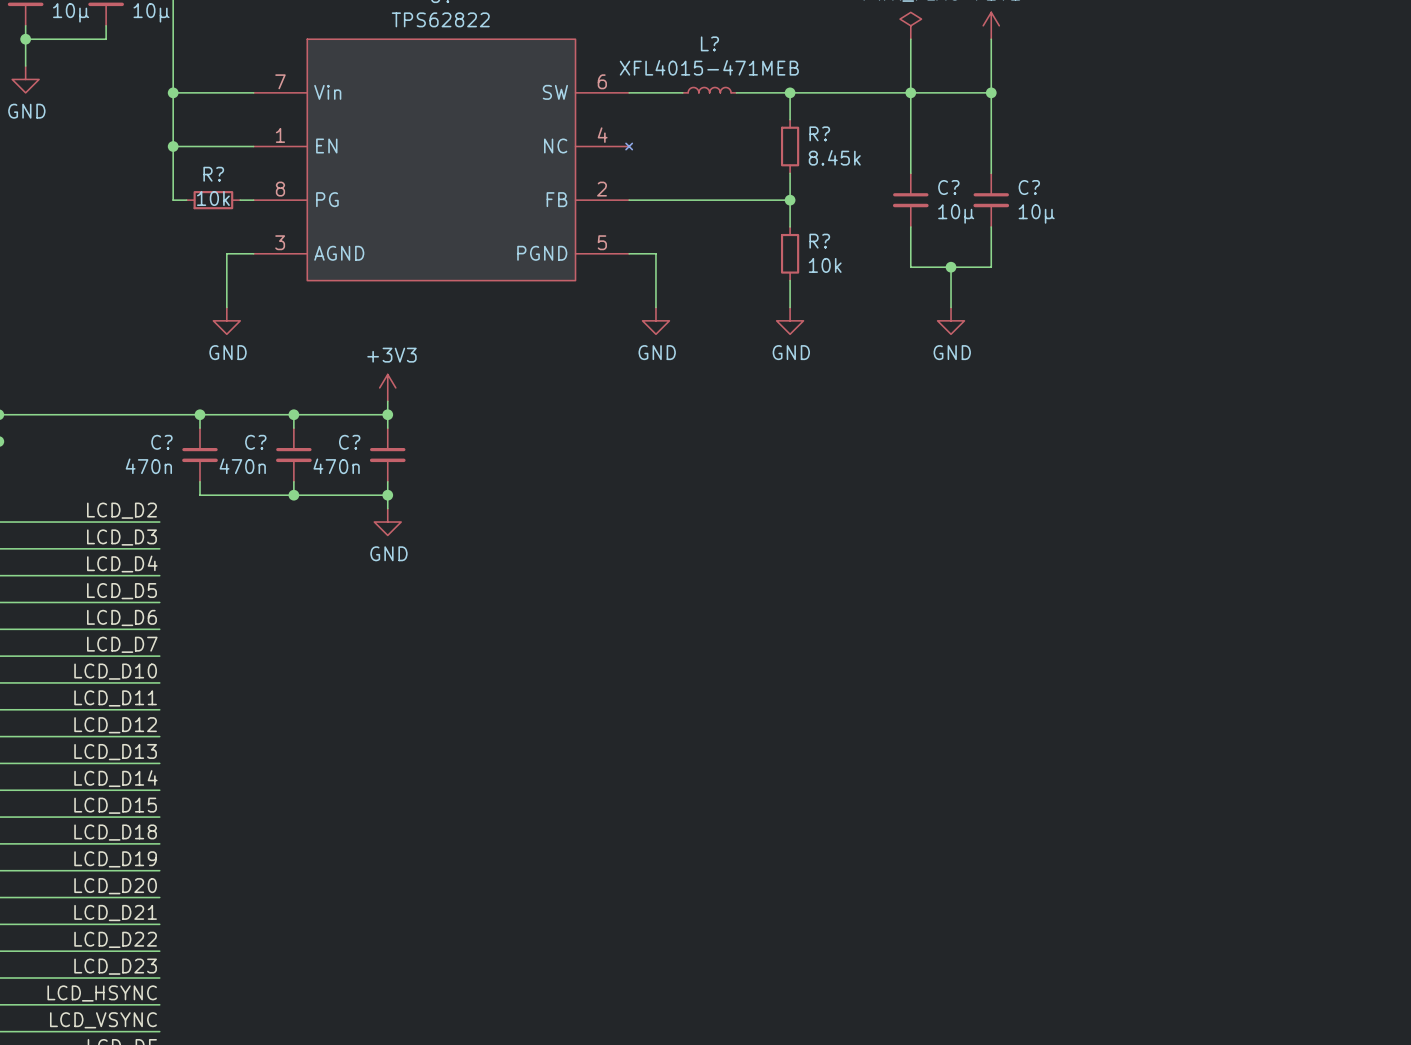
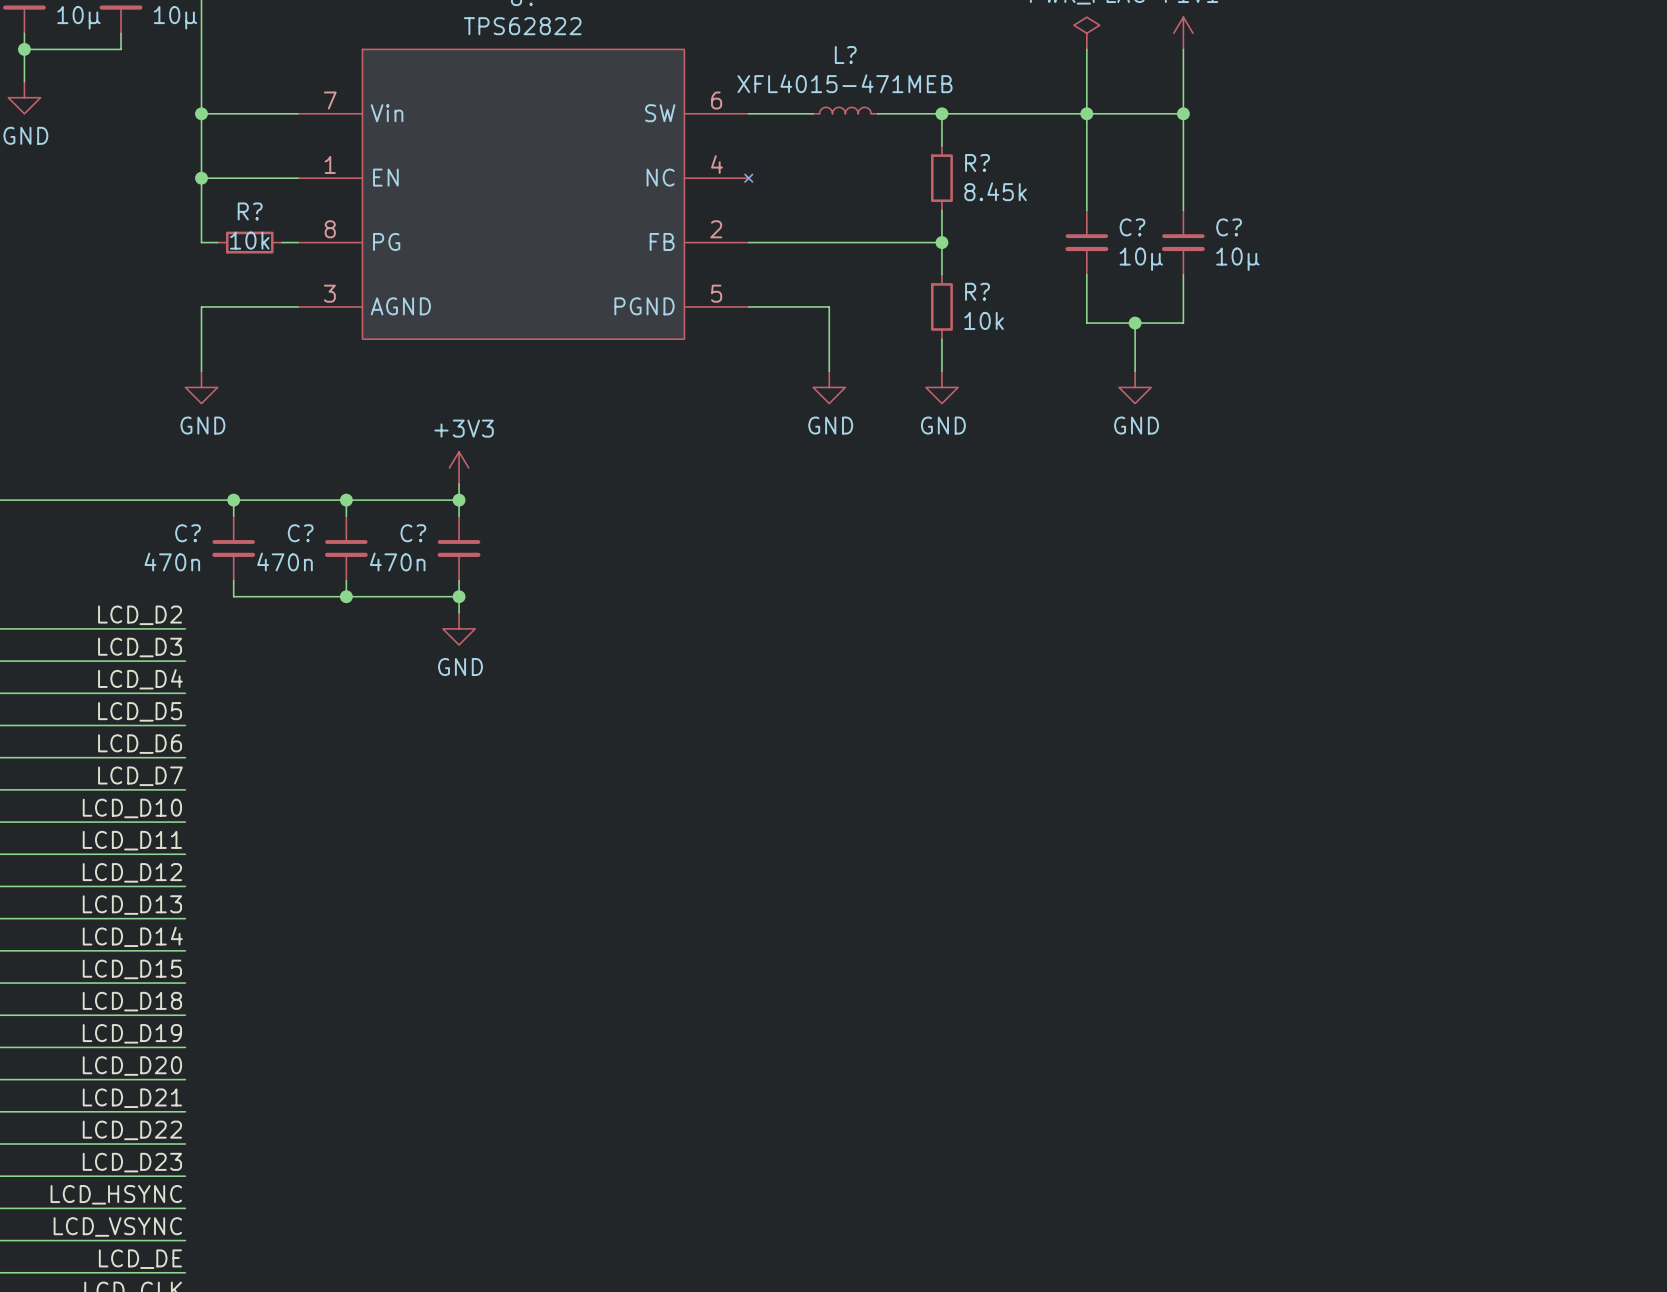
wire: (226, 253) (226, 307) -> (265, 306) (201, 306) (201, 371)
wire: (655, 253) (655, 307) -> (780, 306) (829, 306) (829, 371)
power symbol position: GND (226, 320) -> GND (201, 387)
power symbol position: GND (655, 320) -> GND (829, 387)

